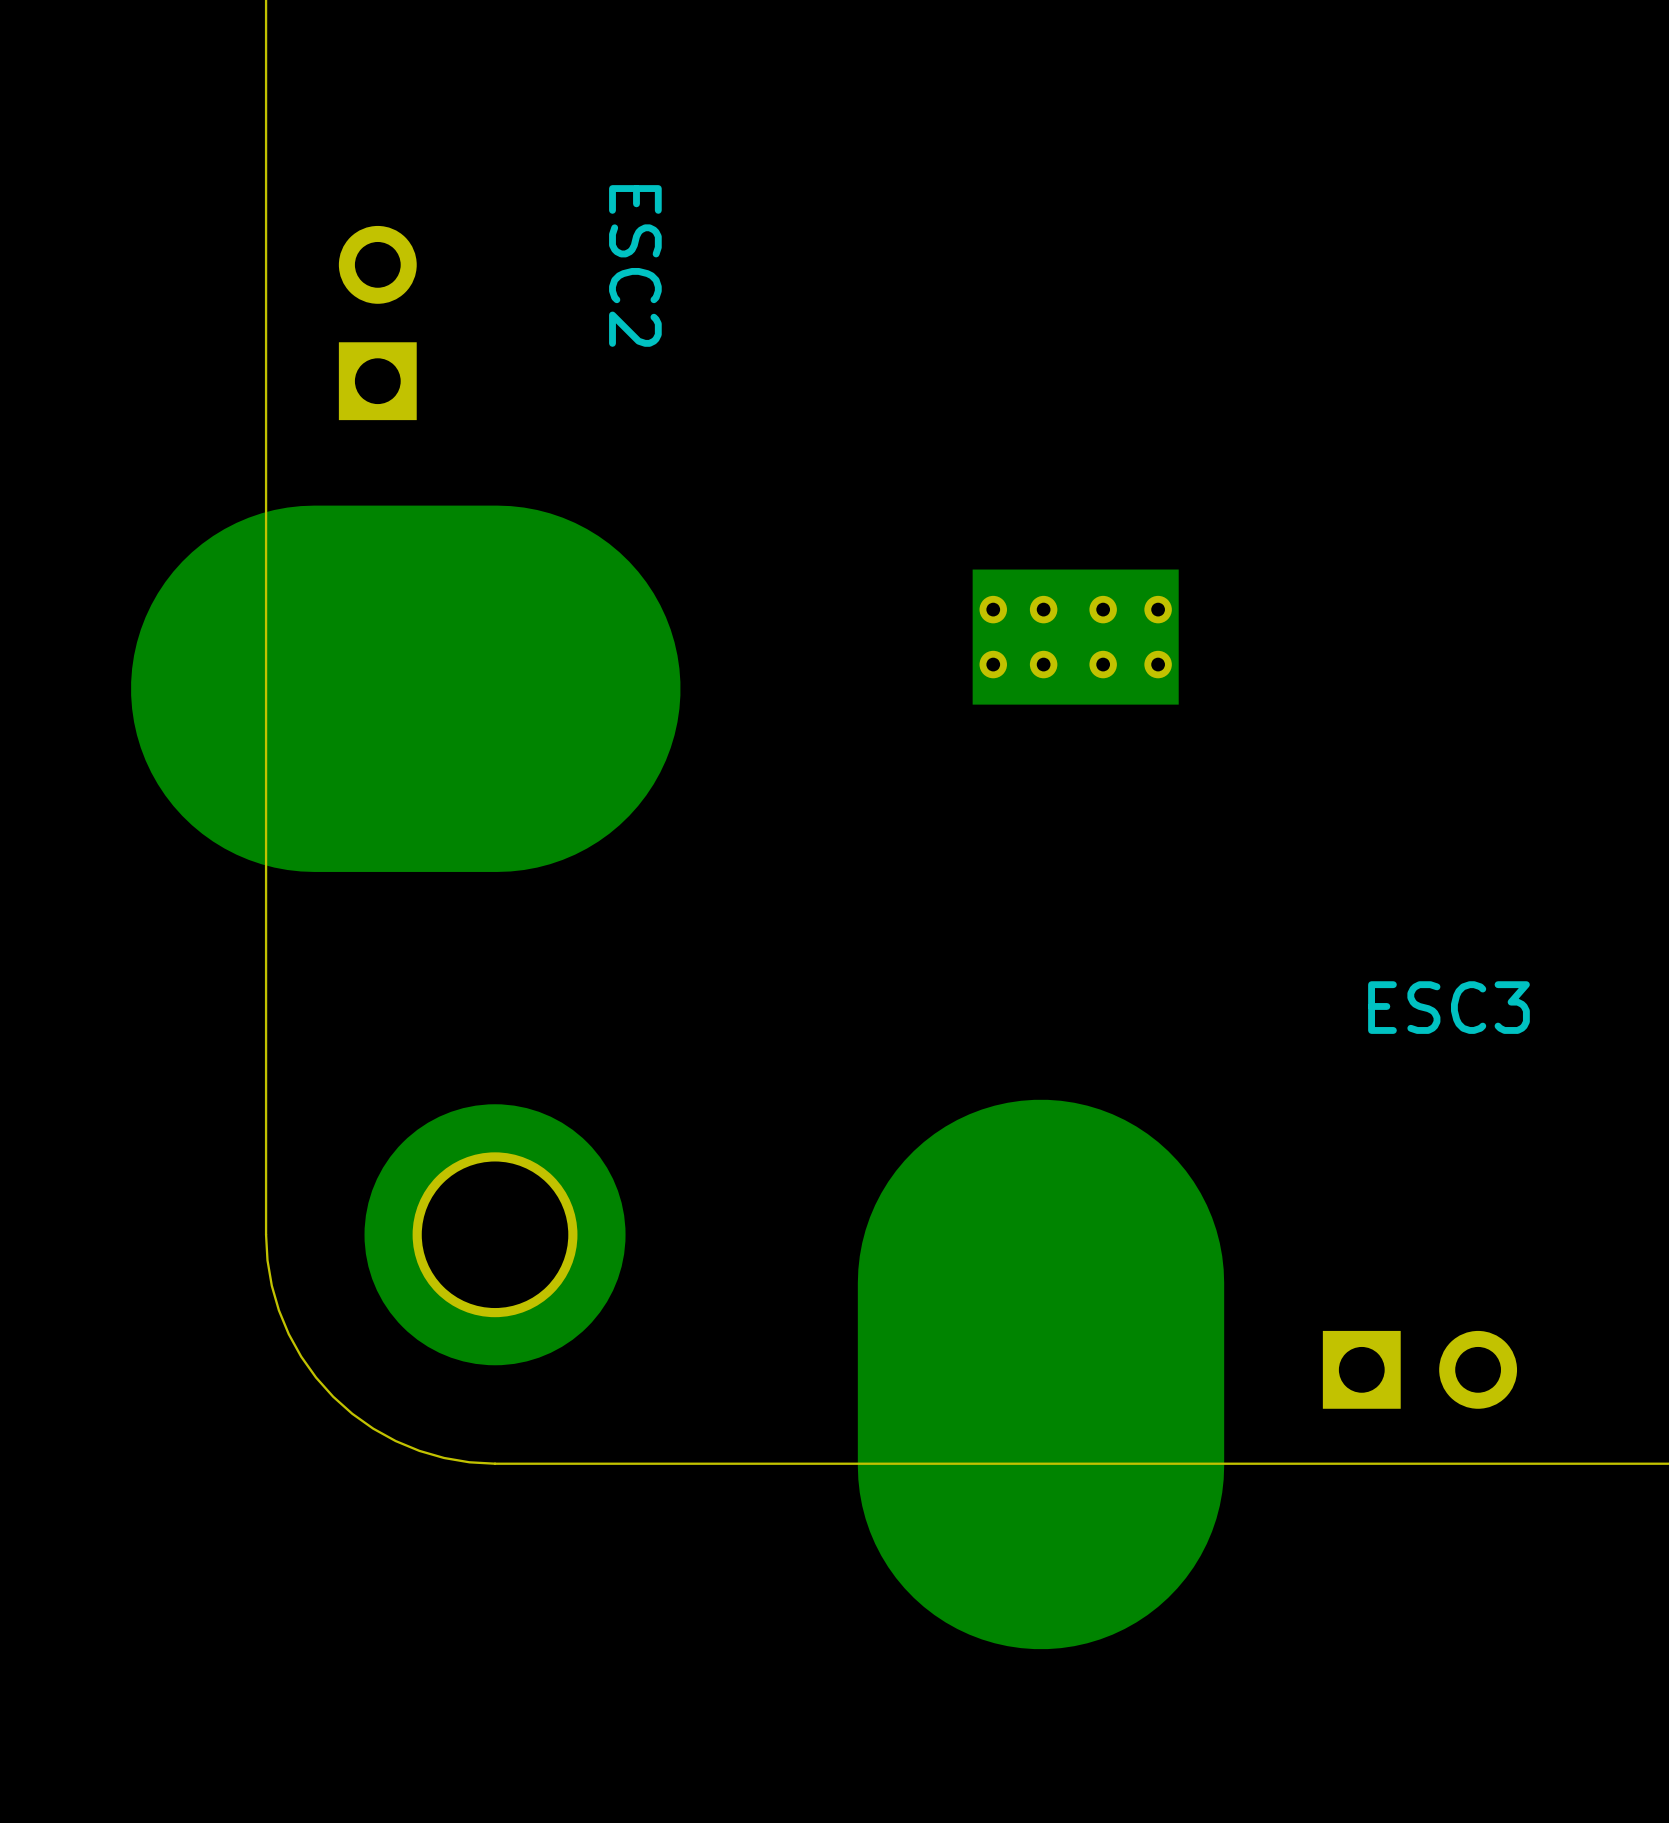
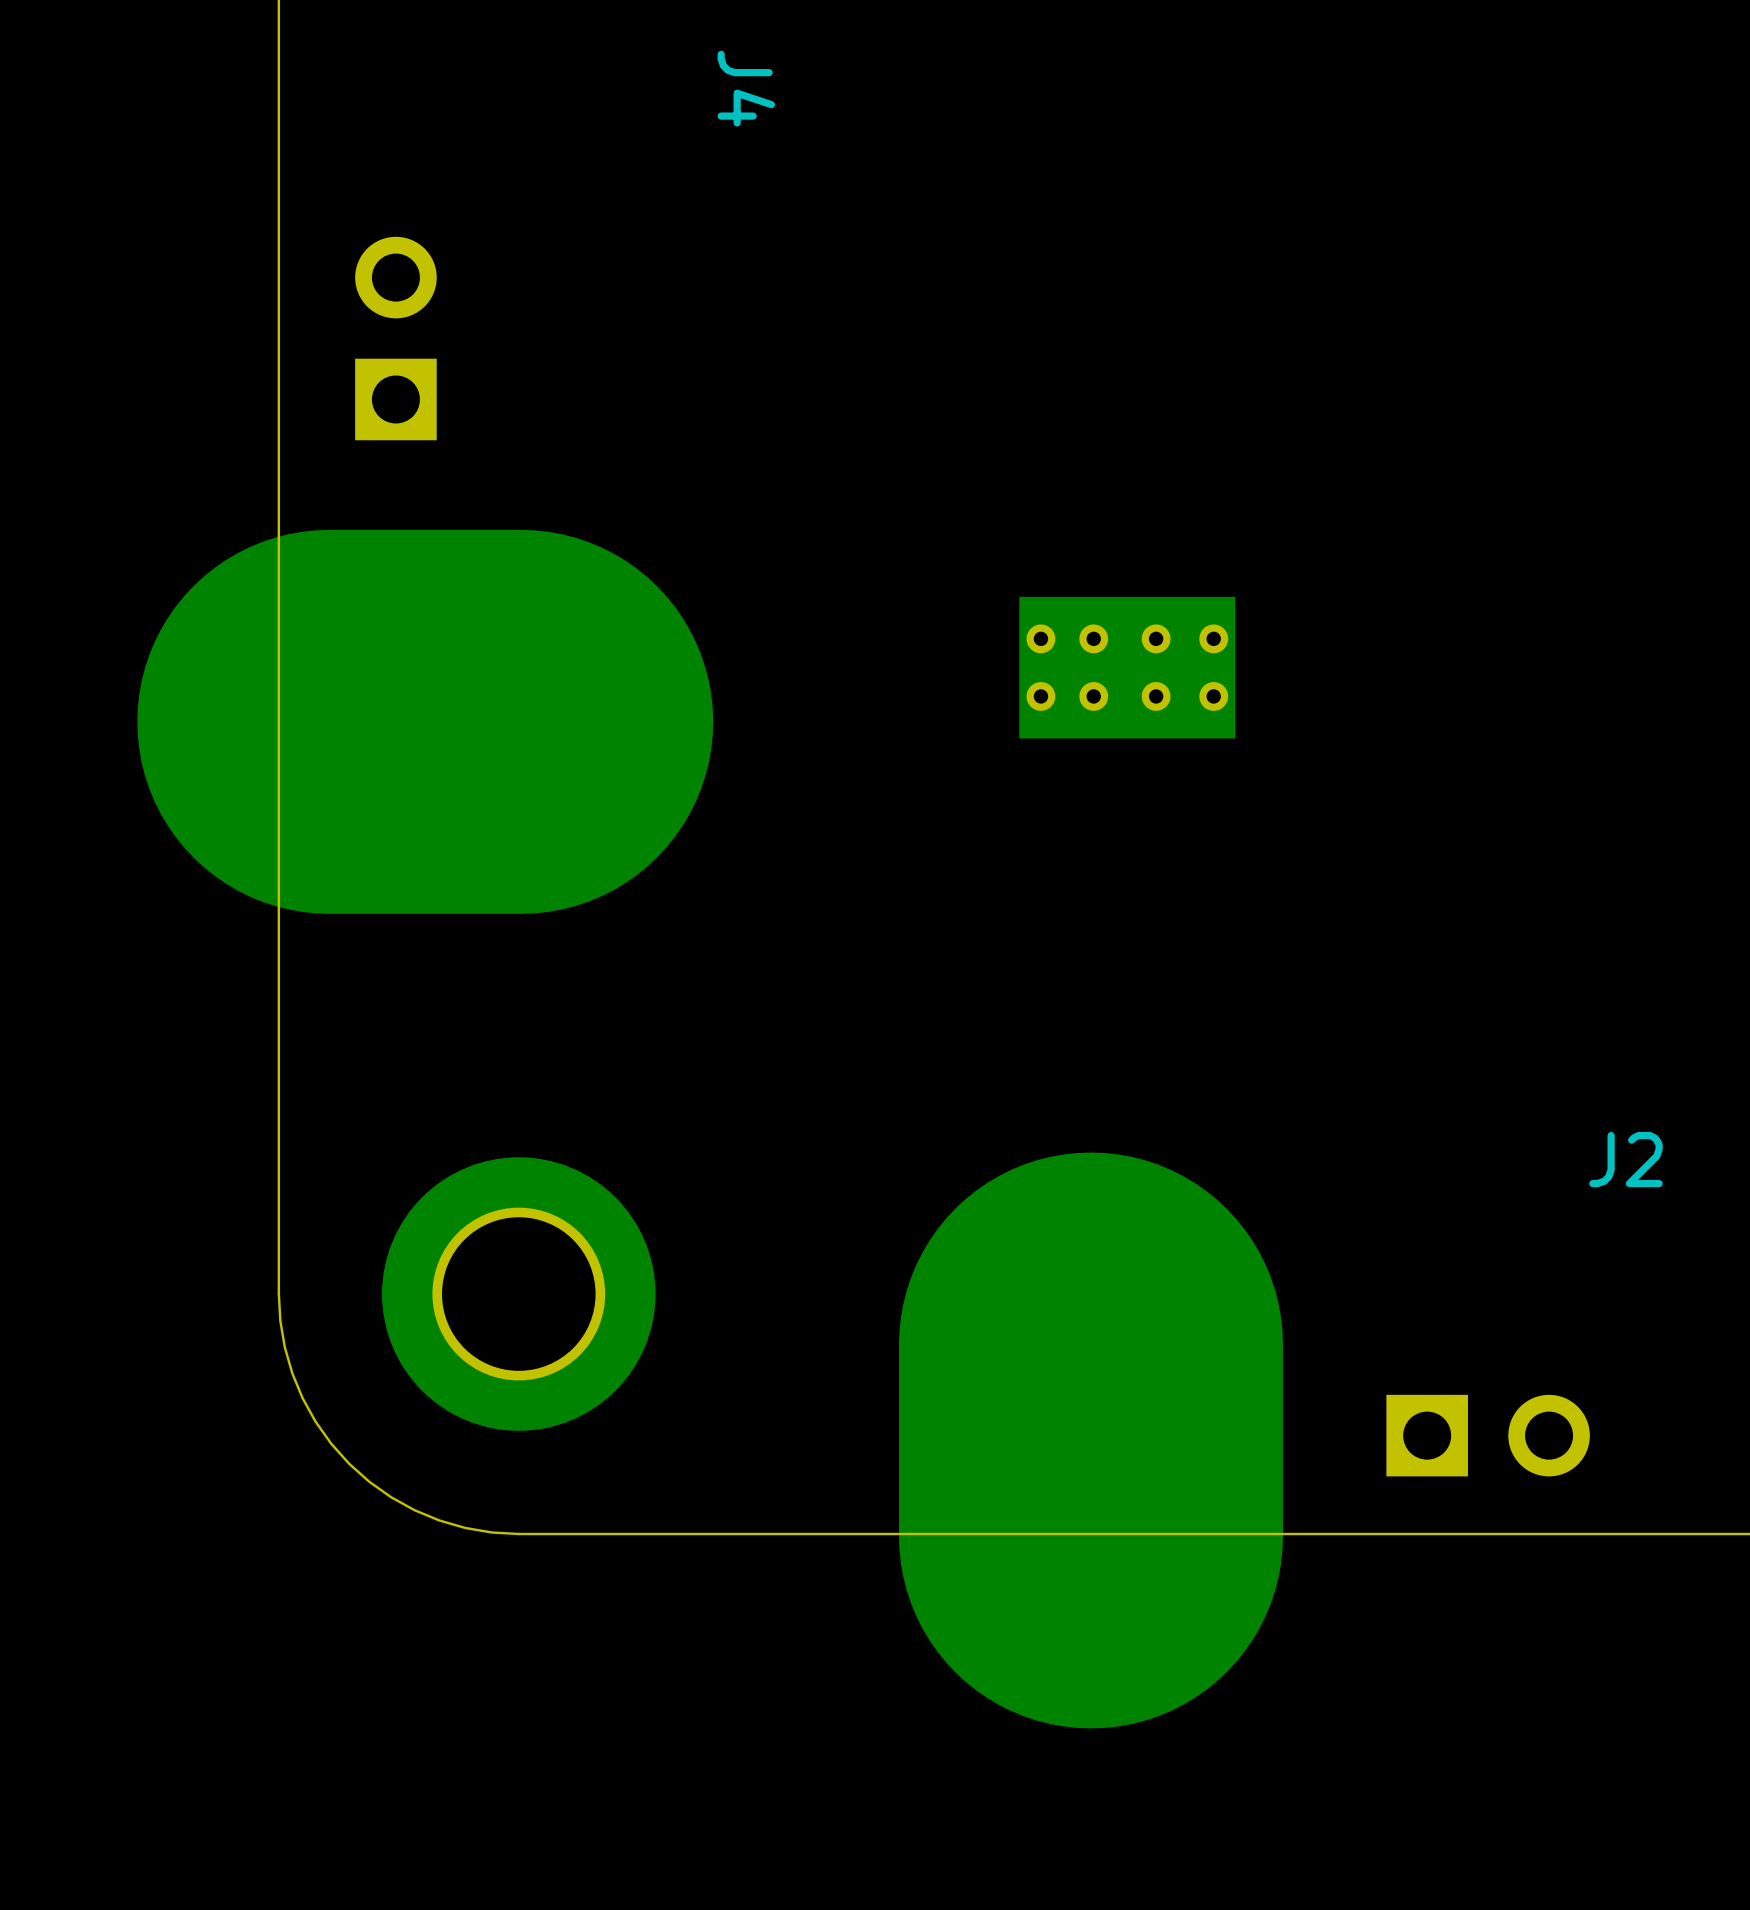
ESC2 name: ESC2 (635, 265) -> J4 (746, 88)
ESC3 name: ESC3 (1448, 1007) -> J2 (1625, 1159)

